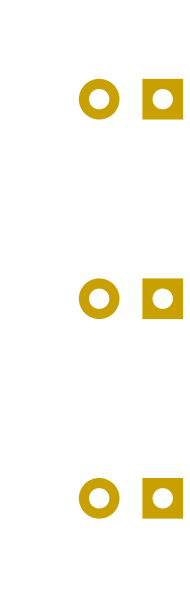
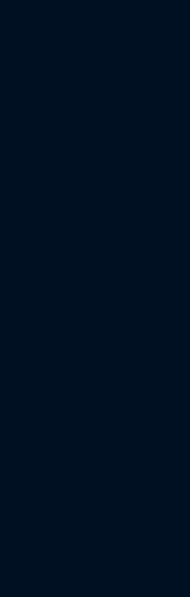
part: (130, 99) -> none
part: (130, 298) -> none
part: (130, 498) -> none

